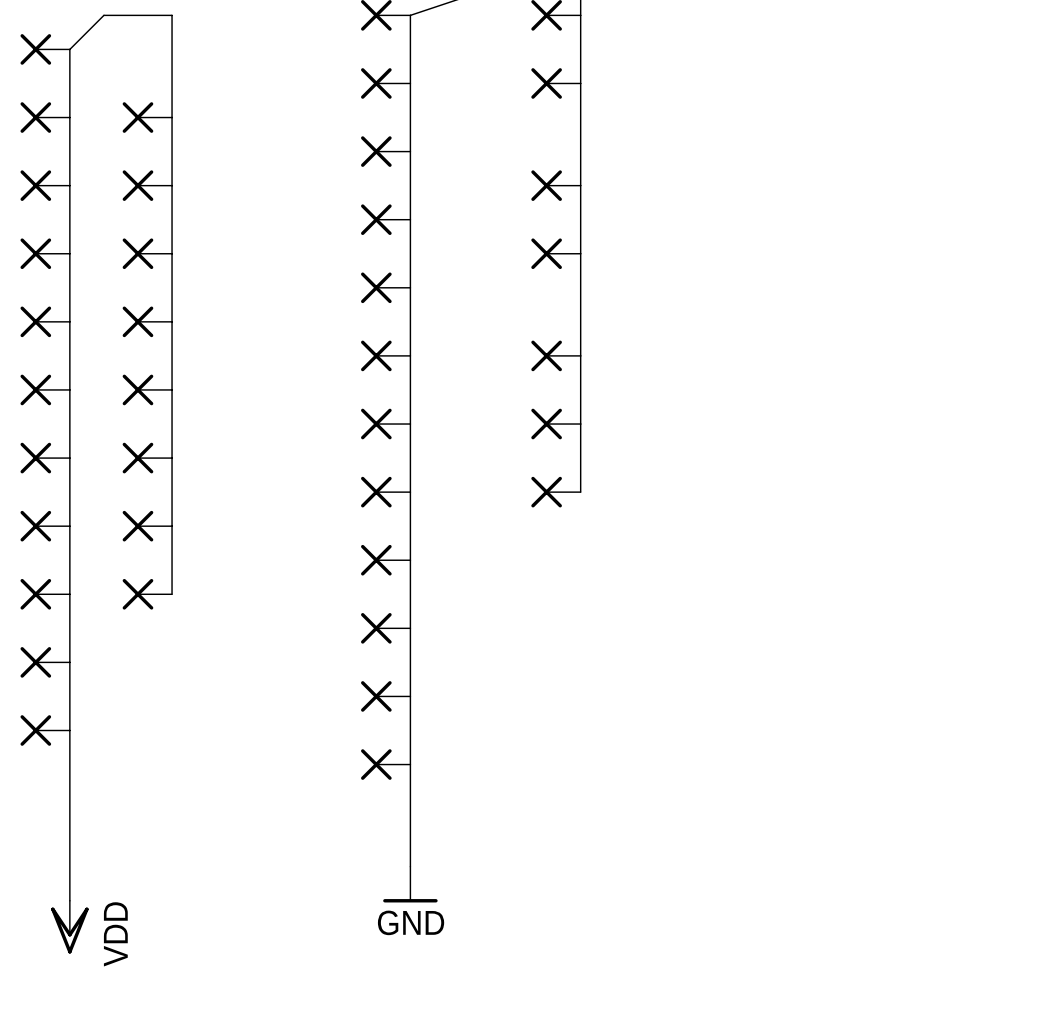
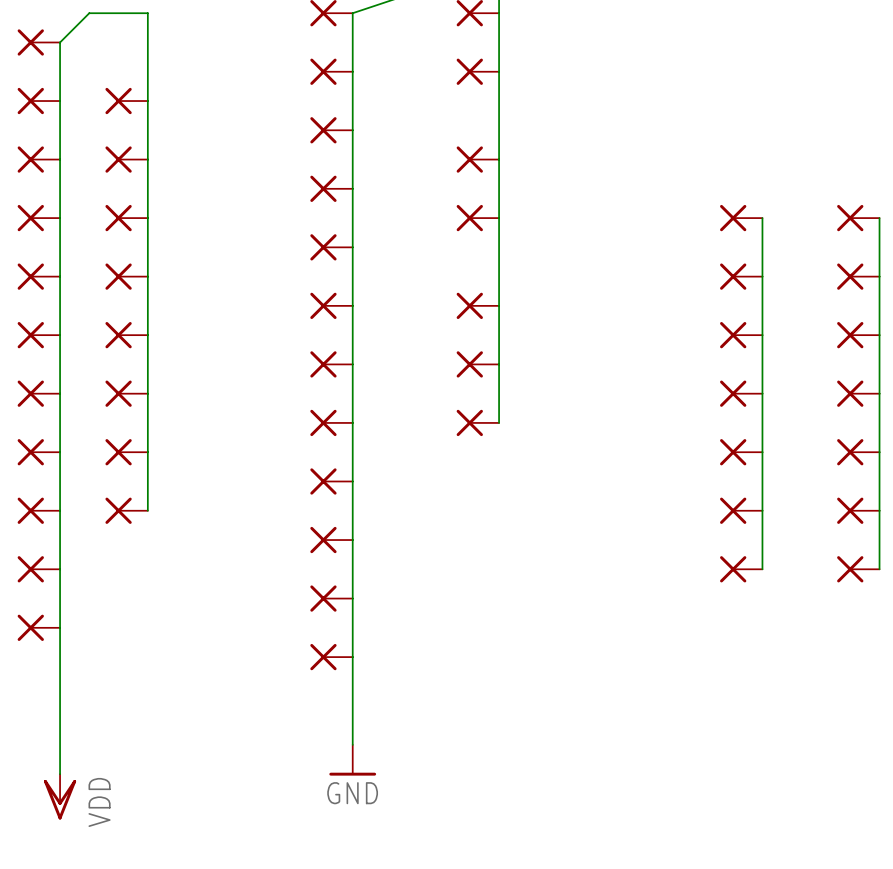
part: none -> (741, 218)
wire: none -> (762, 218) (762, 569)
part: none -> (858, 218)
wire: none -> (879, 218) (879, 569)
part: none -> (741, 276)
part: none -> (858, 276)
part: none -> (741, 335)
part: none -> (858, 335)
part: none -> (741, 393)
part: none -> (858, 393)
part: none -> (741, 452)
part: none -> (858, 452)
part: none -> (741, 510)
part: none -> (858, 510)
part: none -> (741, 569)
part: none -> (858, 569)

